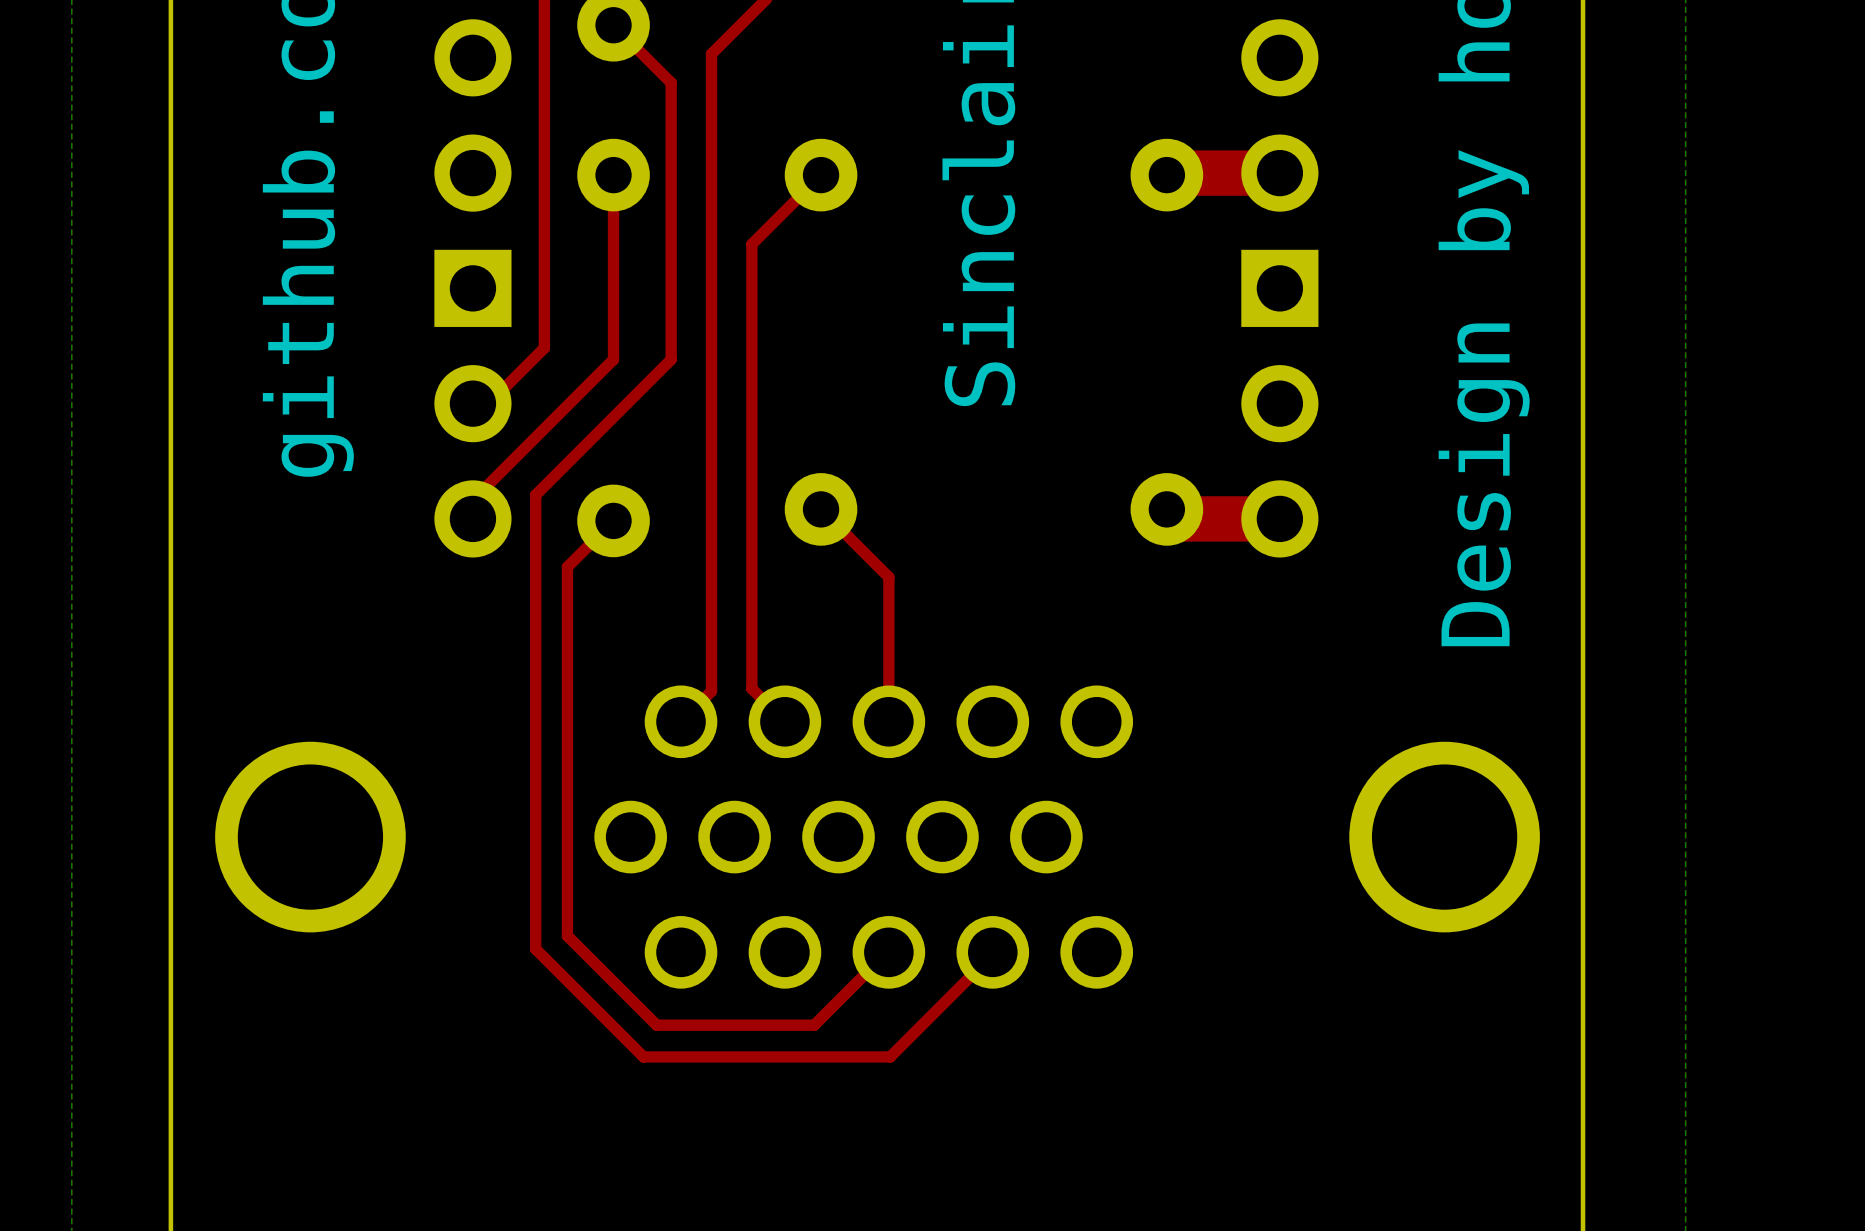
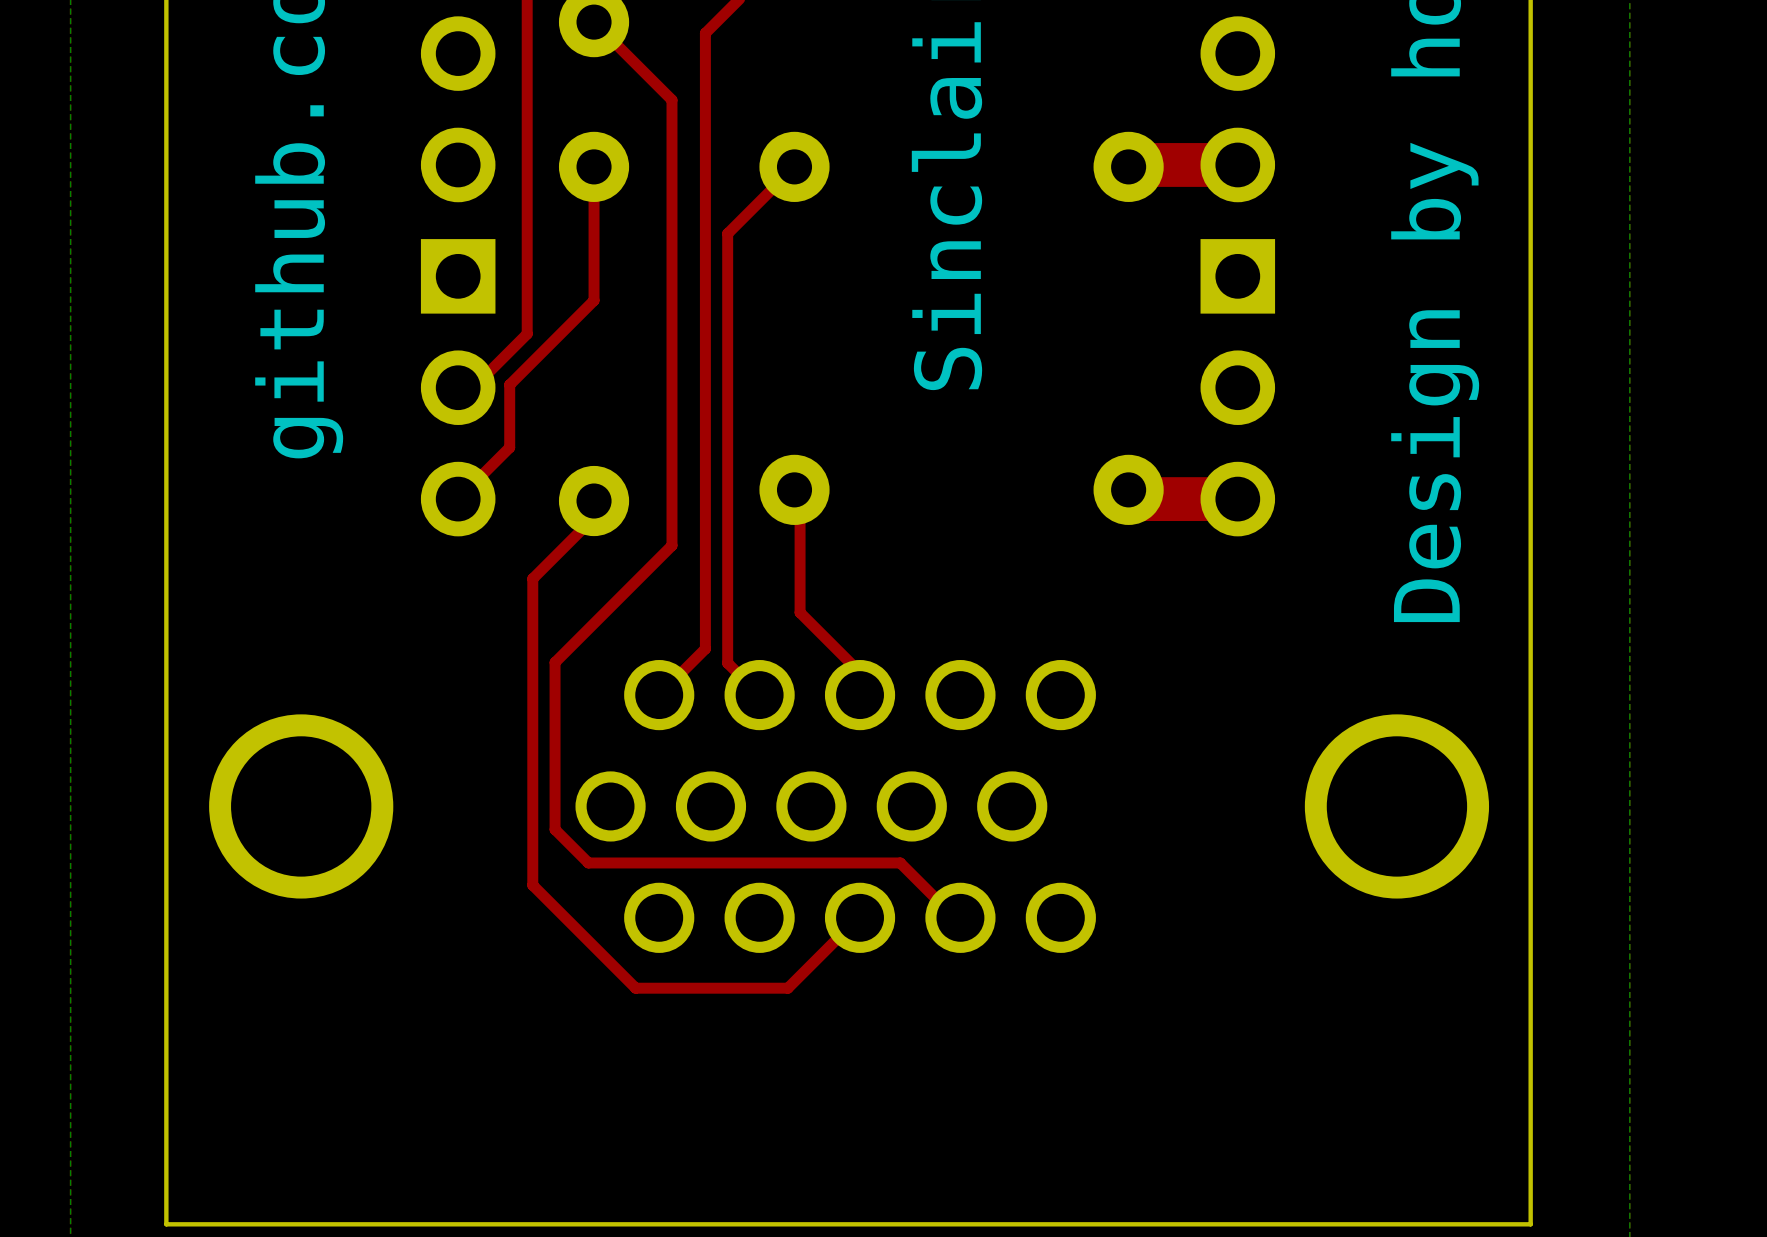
top track: (728, 36) (711, 54) (711, 691) -> (705, 33) (705, 648) (688, 665)
top track: (671, 82) (671, 359) (535, 495) (535, 949) (643, 1056) (890, 1056) (992, 954) -> (649, 77) (671, 100) (671, 545) (555, 662) (555, 829) (588, 862) (900, 862) (960, 923) (960, 919)
top track: (613, 313) (613, 359) (472, 500) (472, 518) -> (594, 300) (509, 384) (509, 447) (458, 499)
top track: (821, 509) (888, 577) (888, 698) -> (800, 490) (800, 612) (860, 672)
top track: (613, 520) (567, 567) (567, 935) -> (594, 517) (532, 578) (532, 885) (549, 901)

